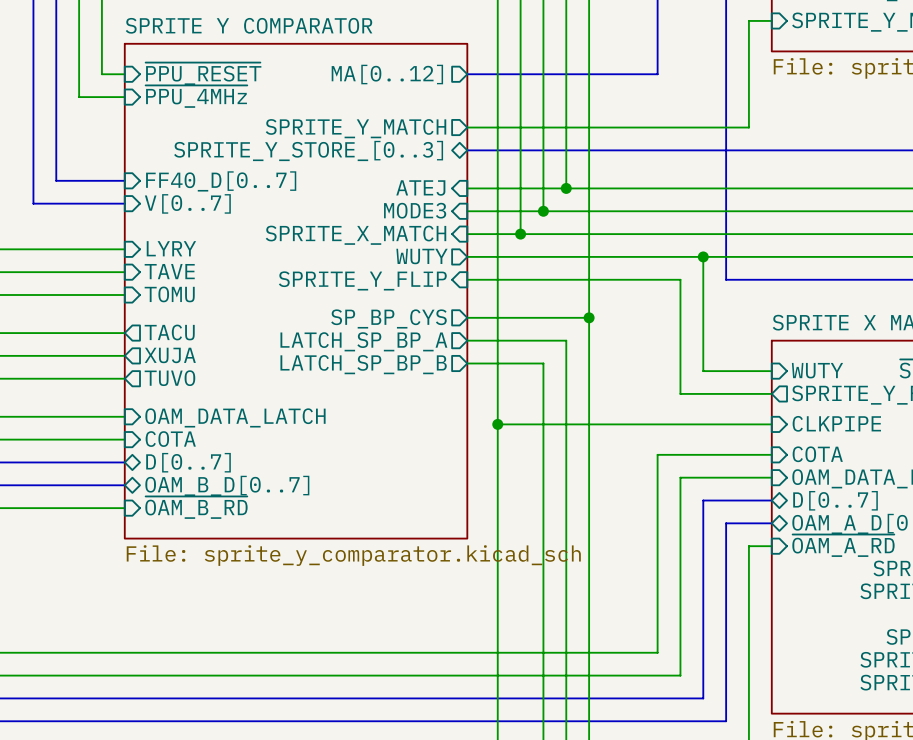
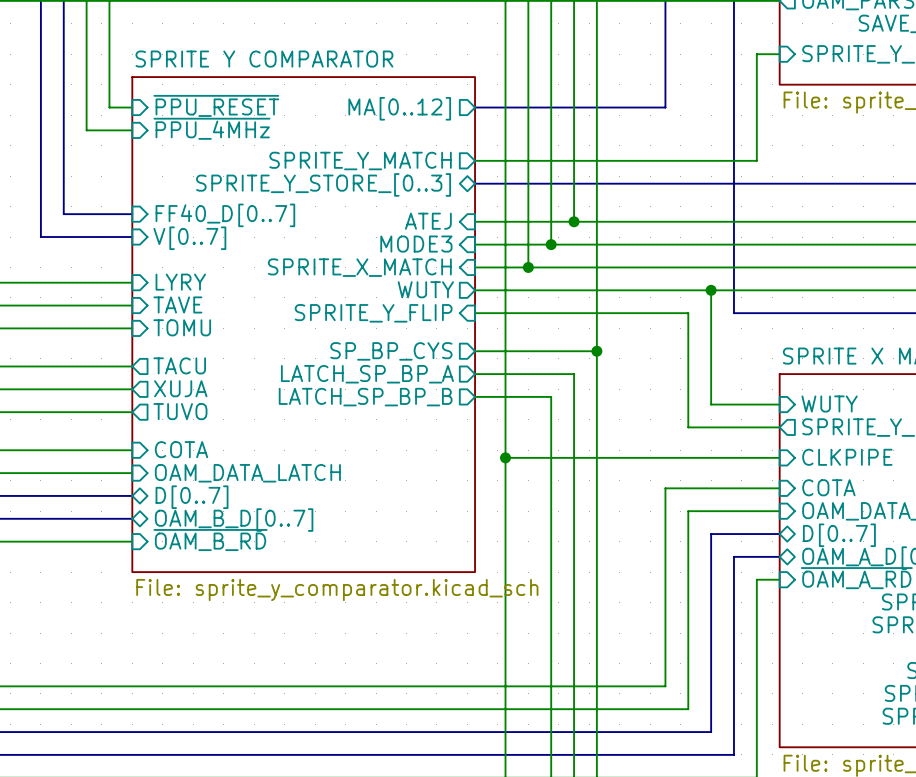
sheet pin: OAM_DATA_LATCH (235, 417) -> COTA (181, 449)
sheet pin: COTA (170, 439) -> OAM_DATA_LATCH (247, 473)

